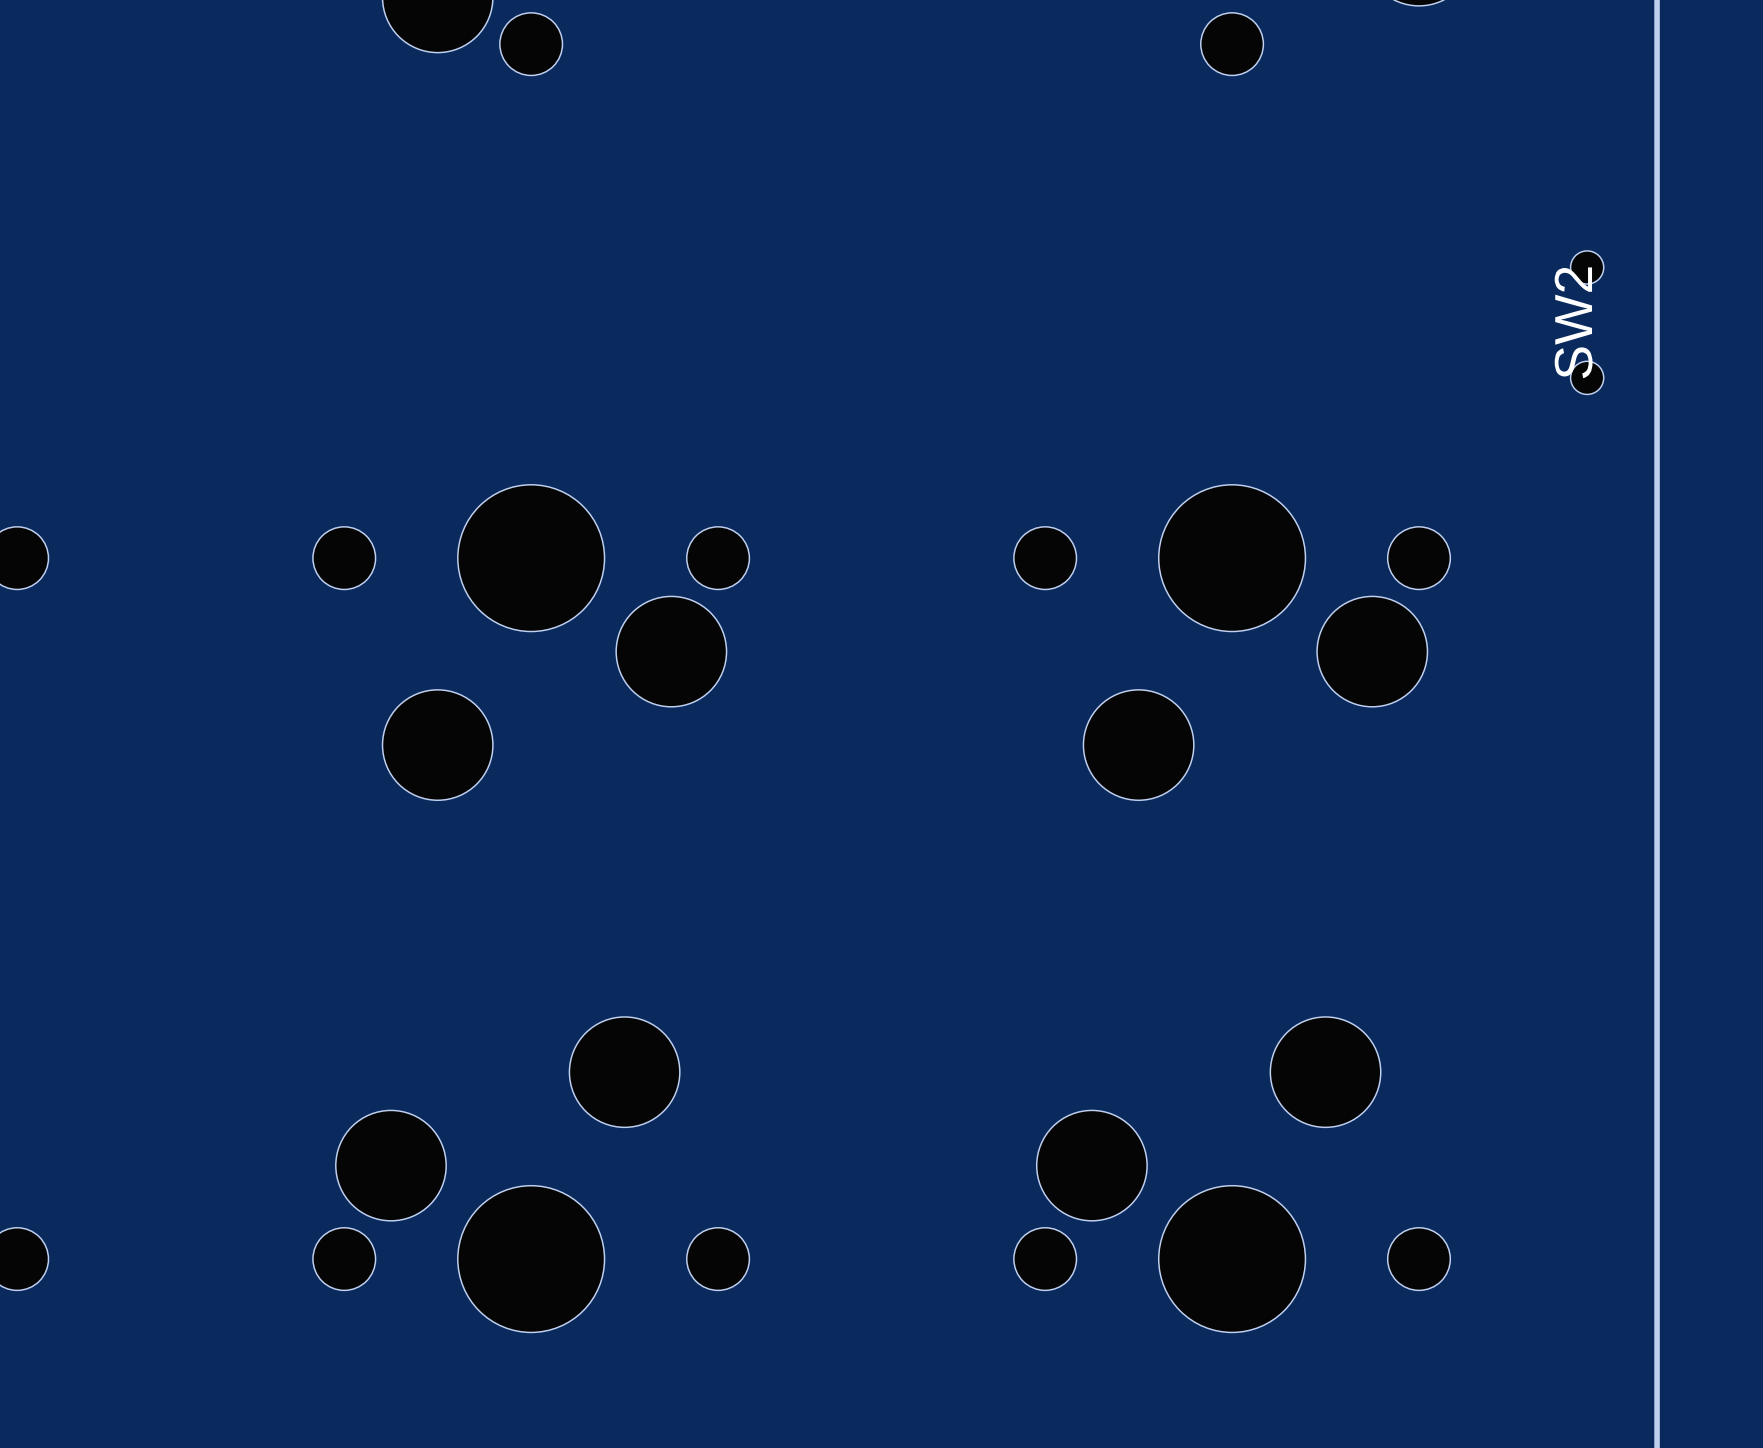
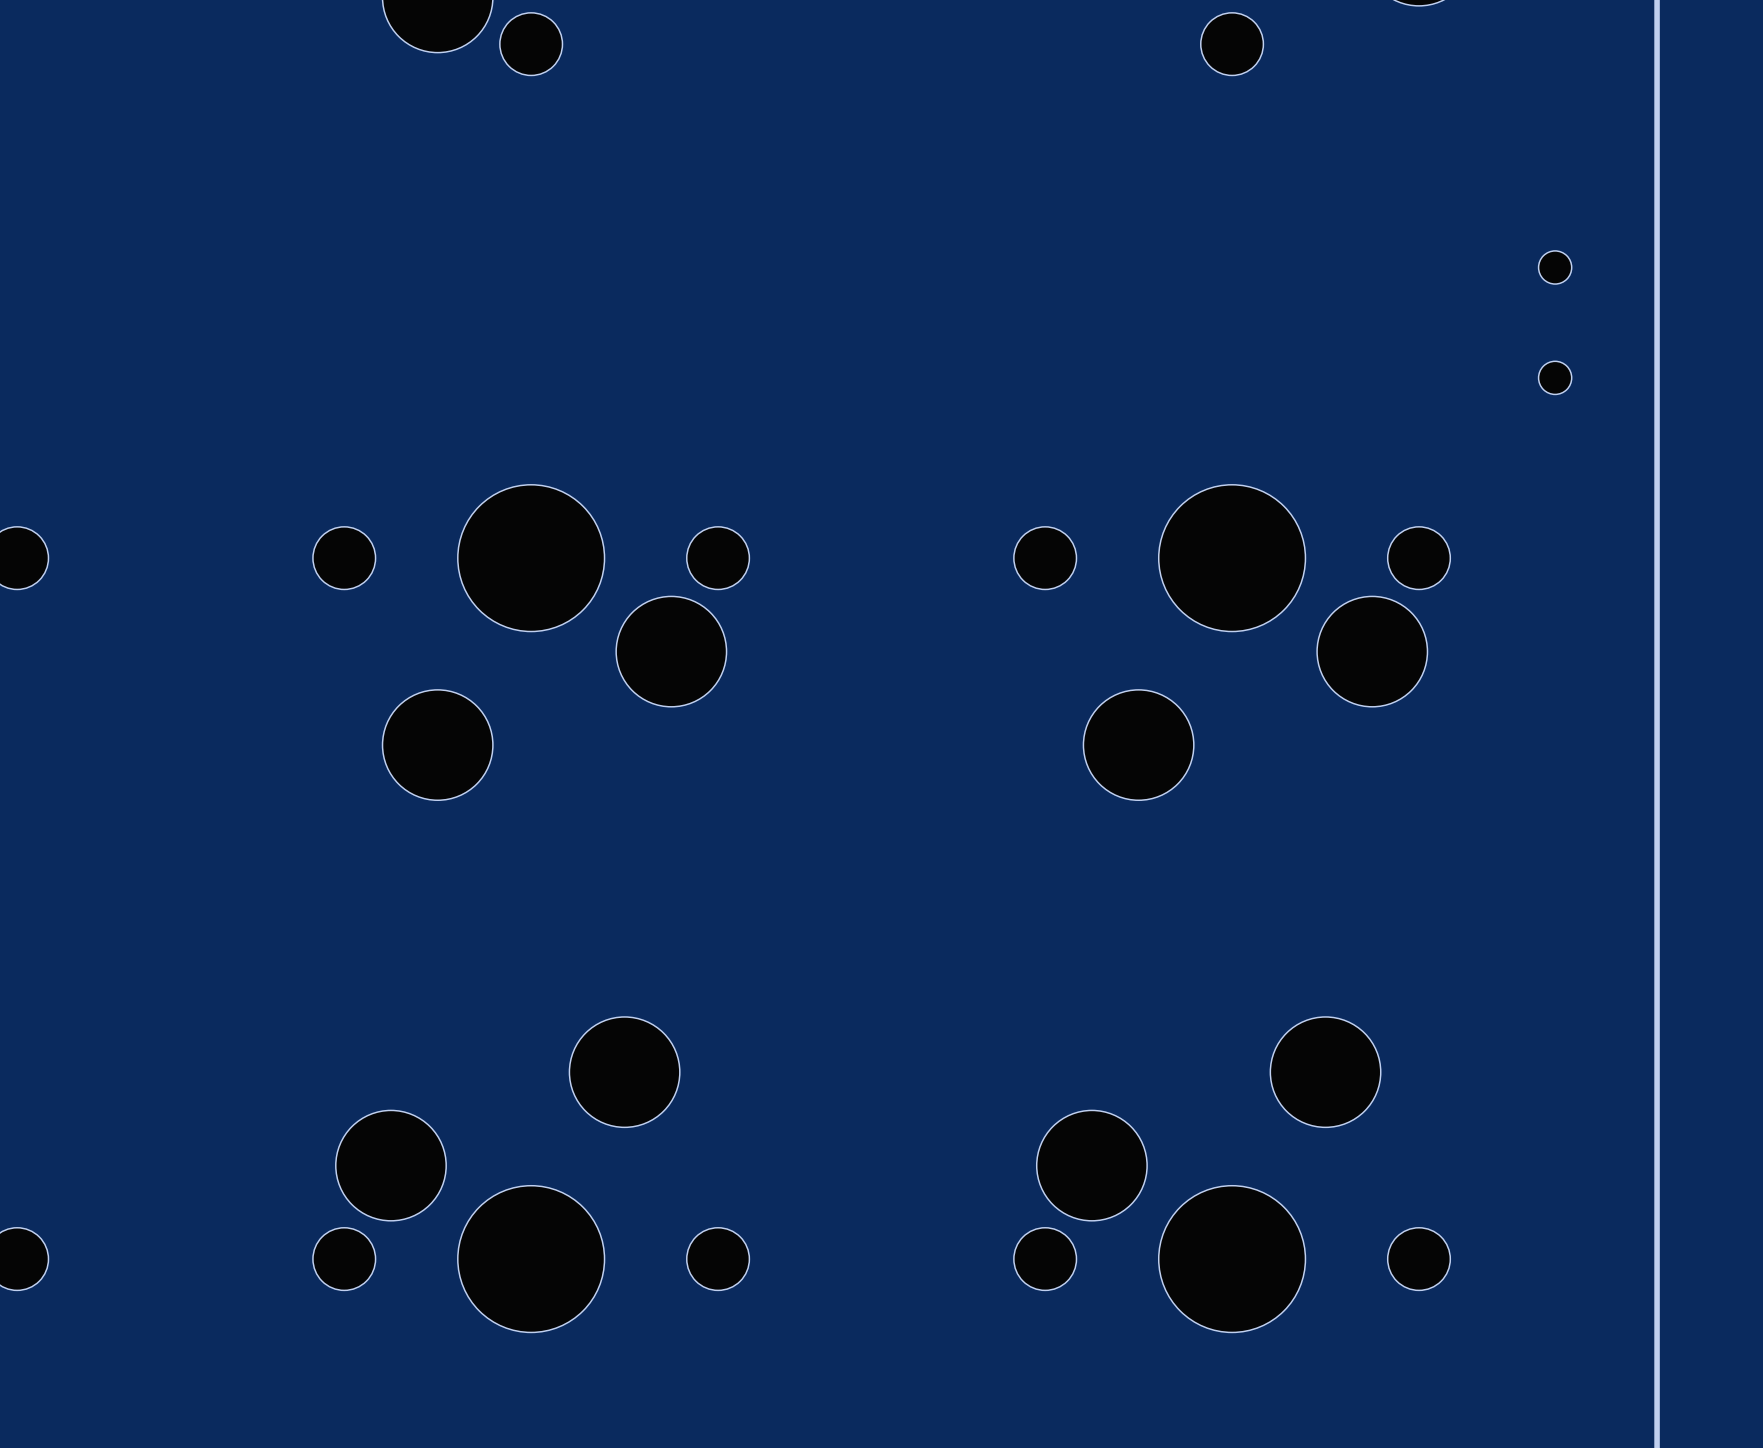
SW2 name: SW2 (1573, 322) -> none
SW2 position: (1587, 322) -> (1555, 322)

